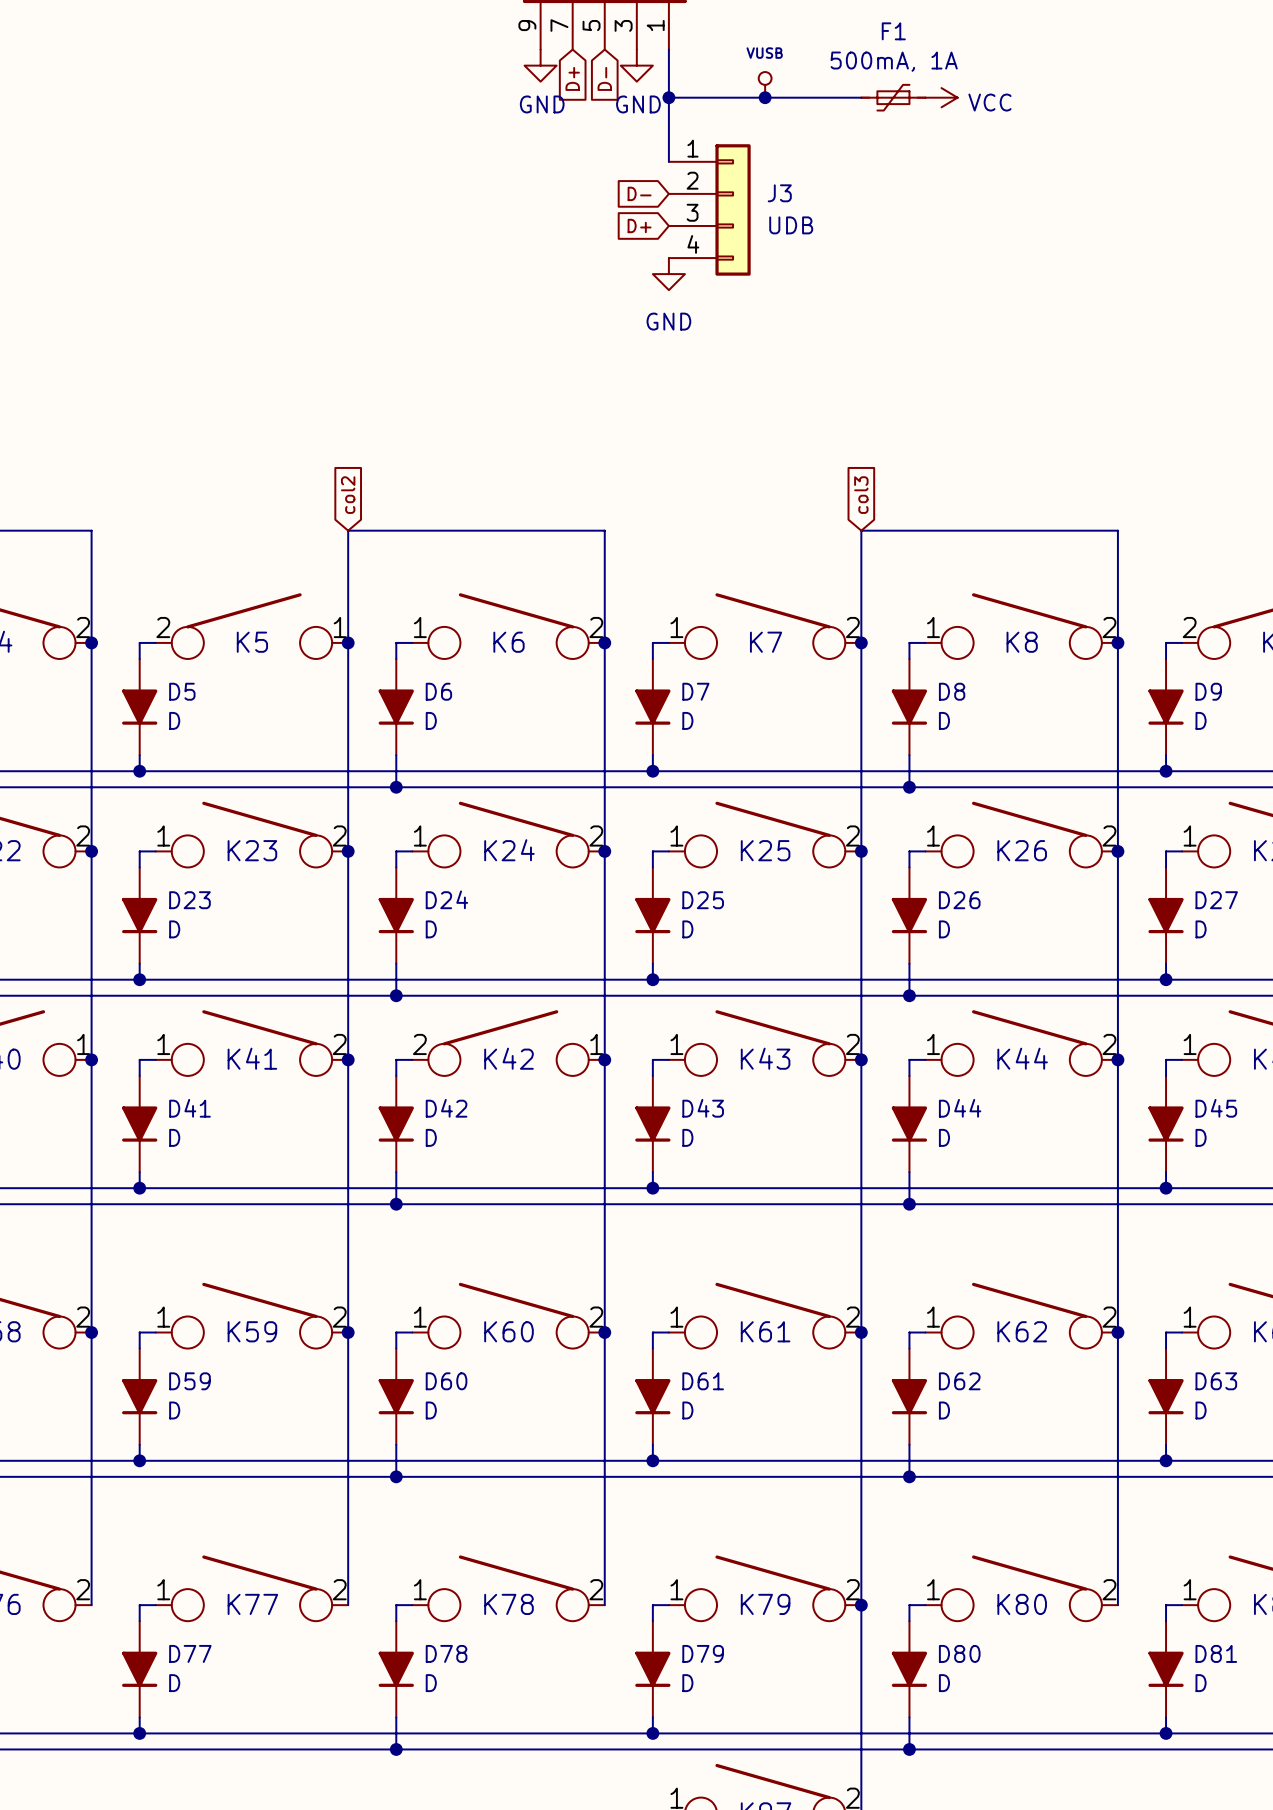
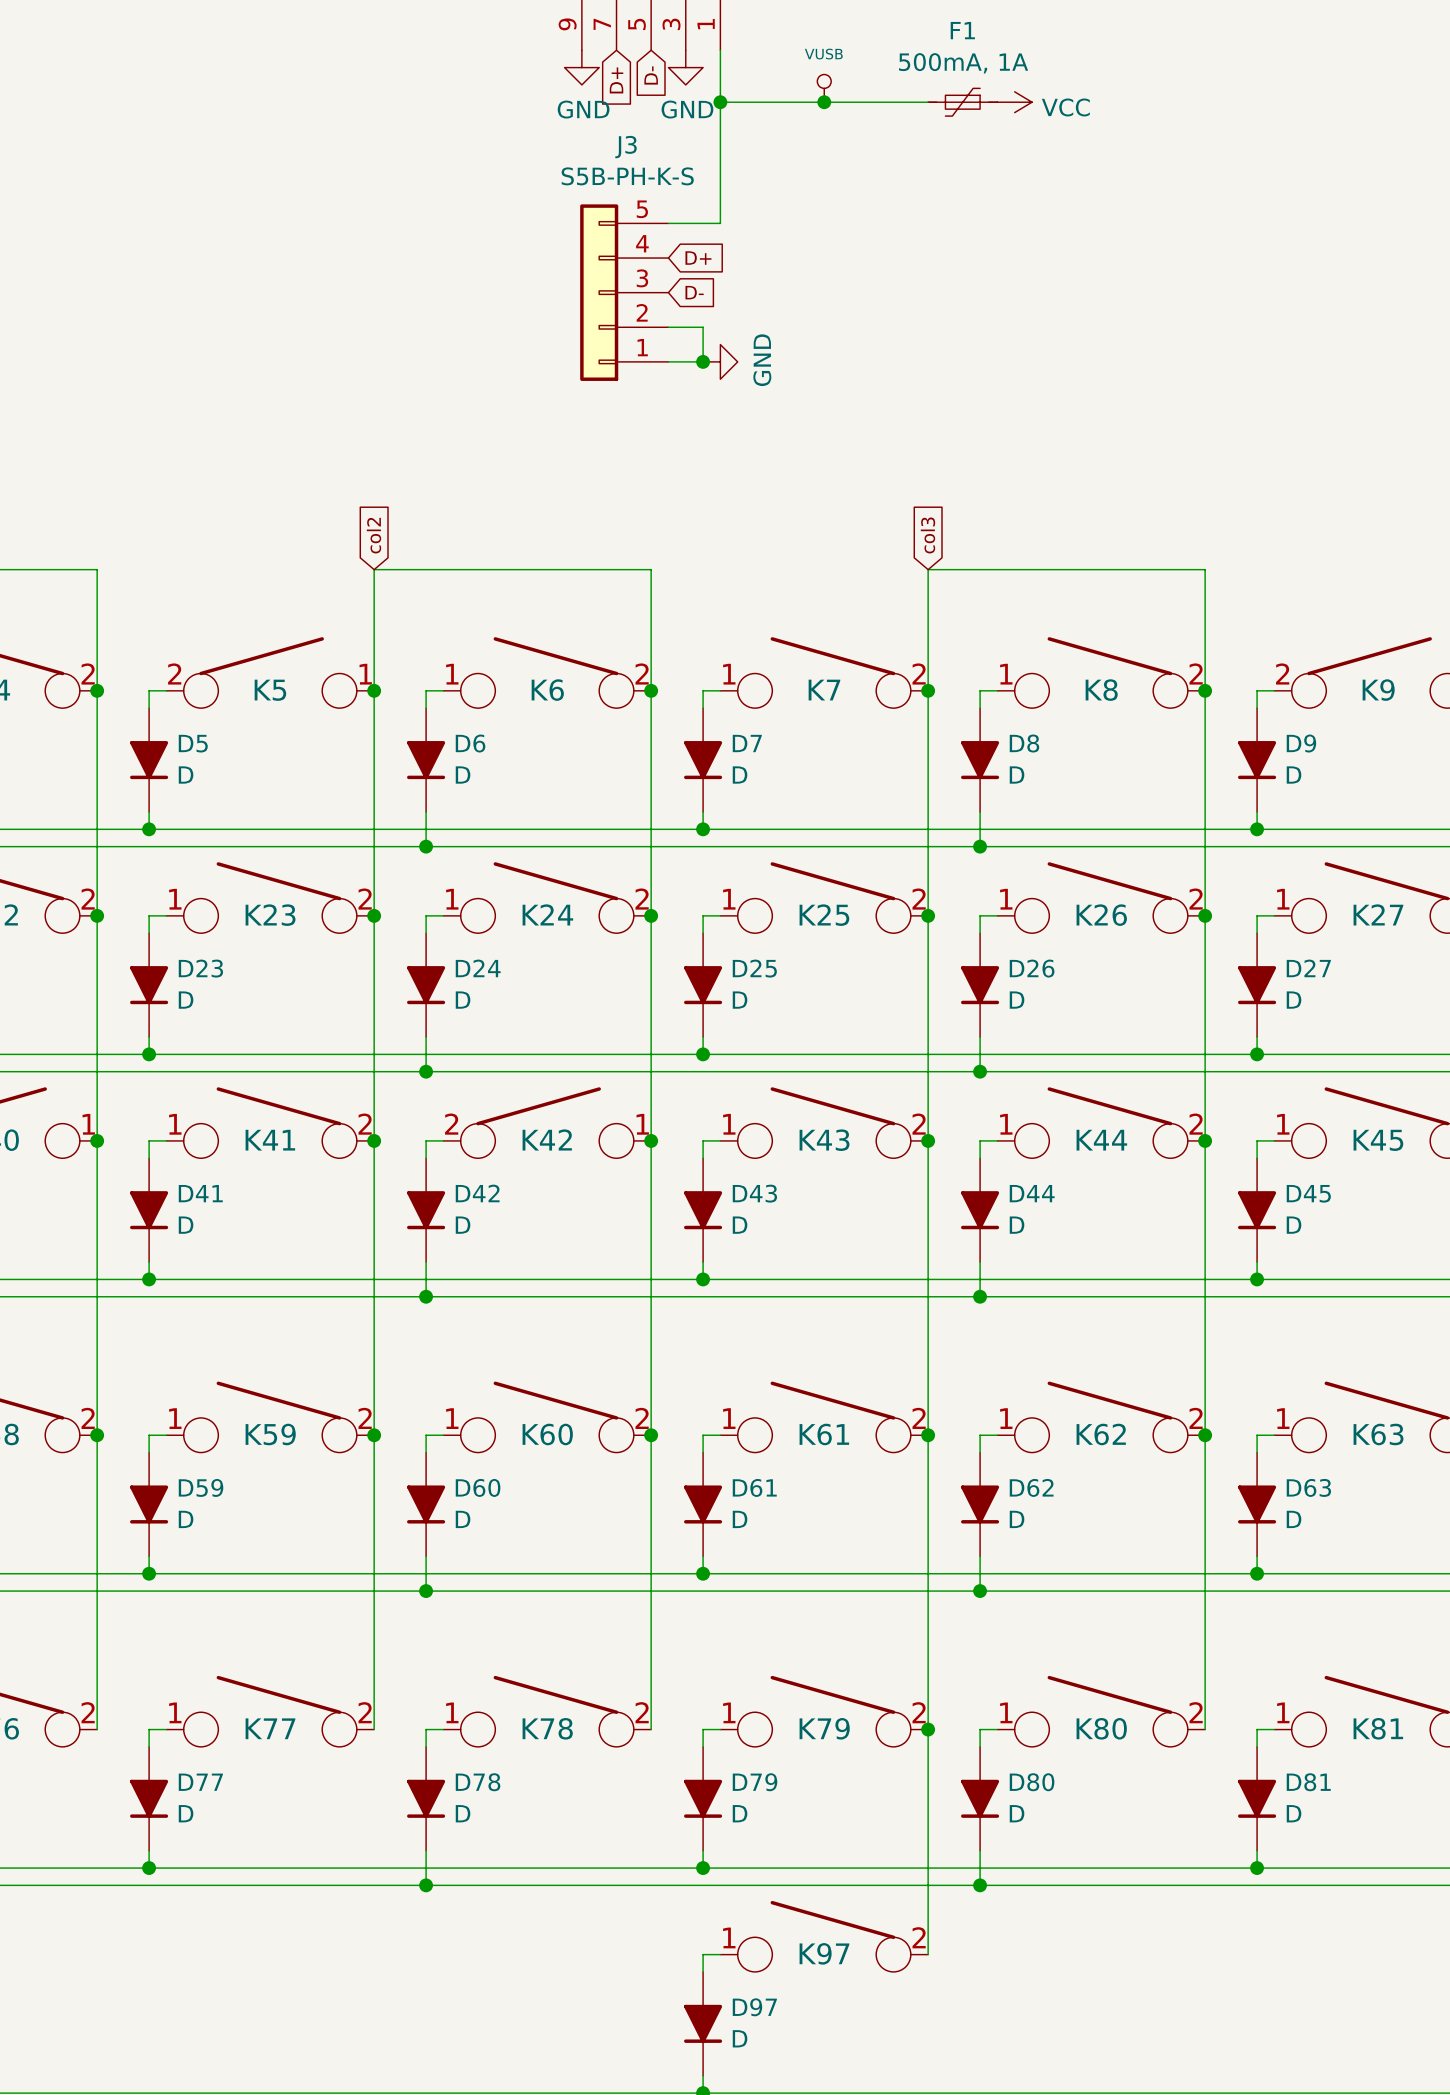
J3 symbol: [668, 144, 751, 276] -> [580, 204, 669, 381]
wire: none -> (720, 171) (720, 223) (668, 223)
global label rotation: 0° (639, 193) -> 180° (694, 292)
global label position: D- (639, 193) -> D- (694, 292)
J3 name position: J3 (779, 193) -> J3 (626, 147)
global label rotation: 0° (639, 225) -> 180° (698, 258)
J3 value: UDB (791, 225) -> S5B-PH-K-S (627, 176)
power symbol rotation: 0° (668, 274) -> 90° counterclockwise (720, 361)
power symbol position: GND (668, 274) -> GND (720, 361)
wire: none -> (668, 327) (703, 327) (703, 361) (668, 361)
junction: none -> (703, 361)

